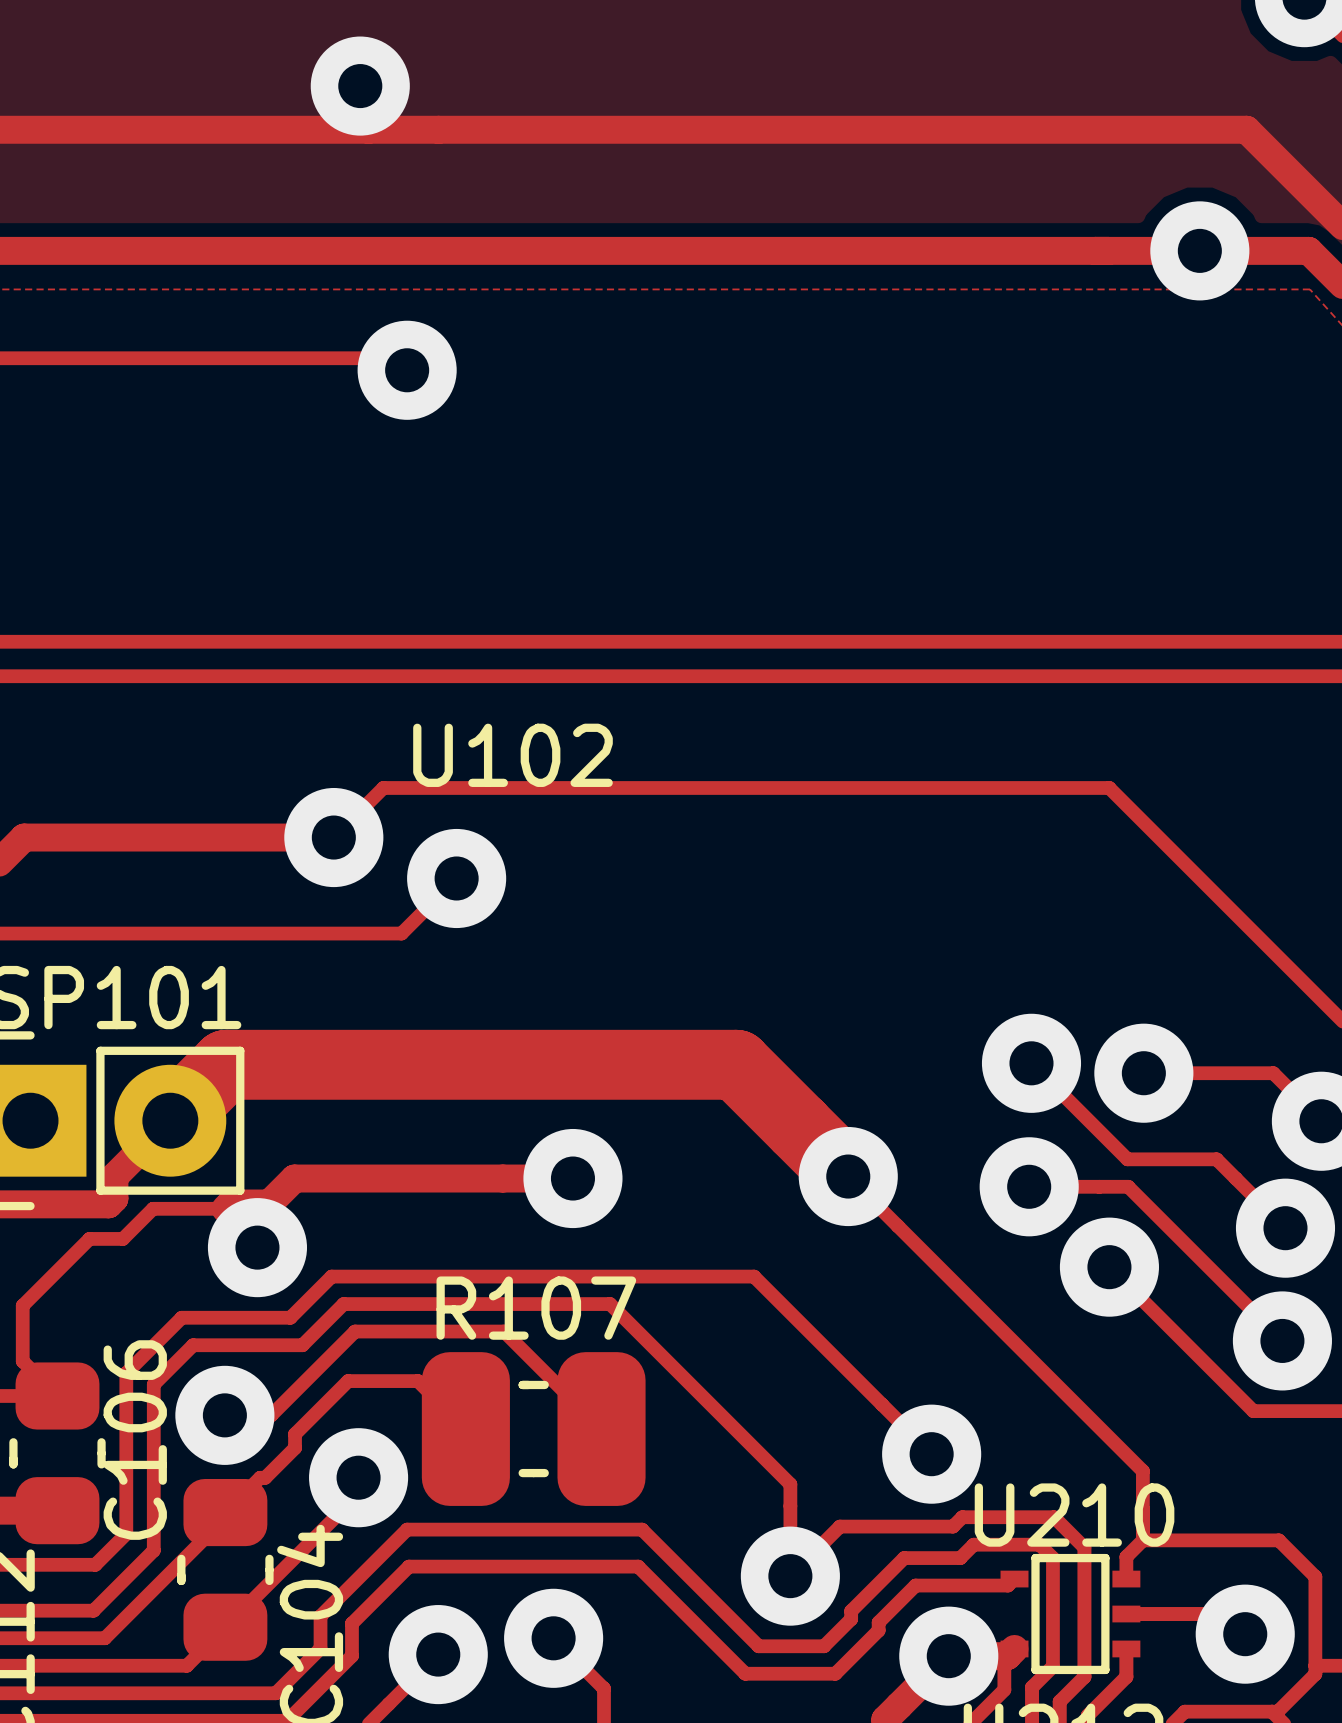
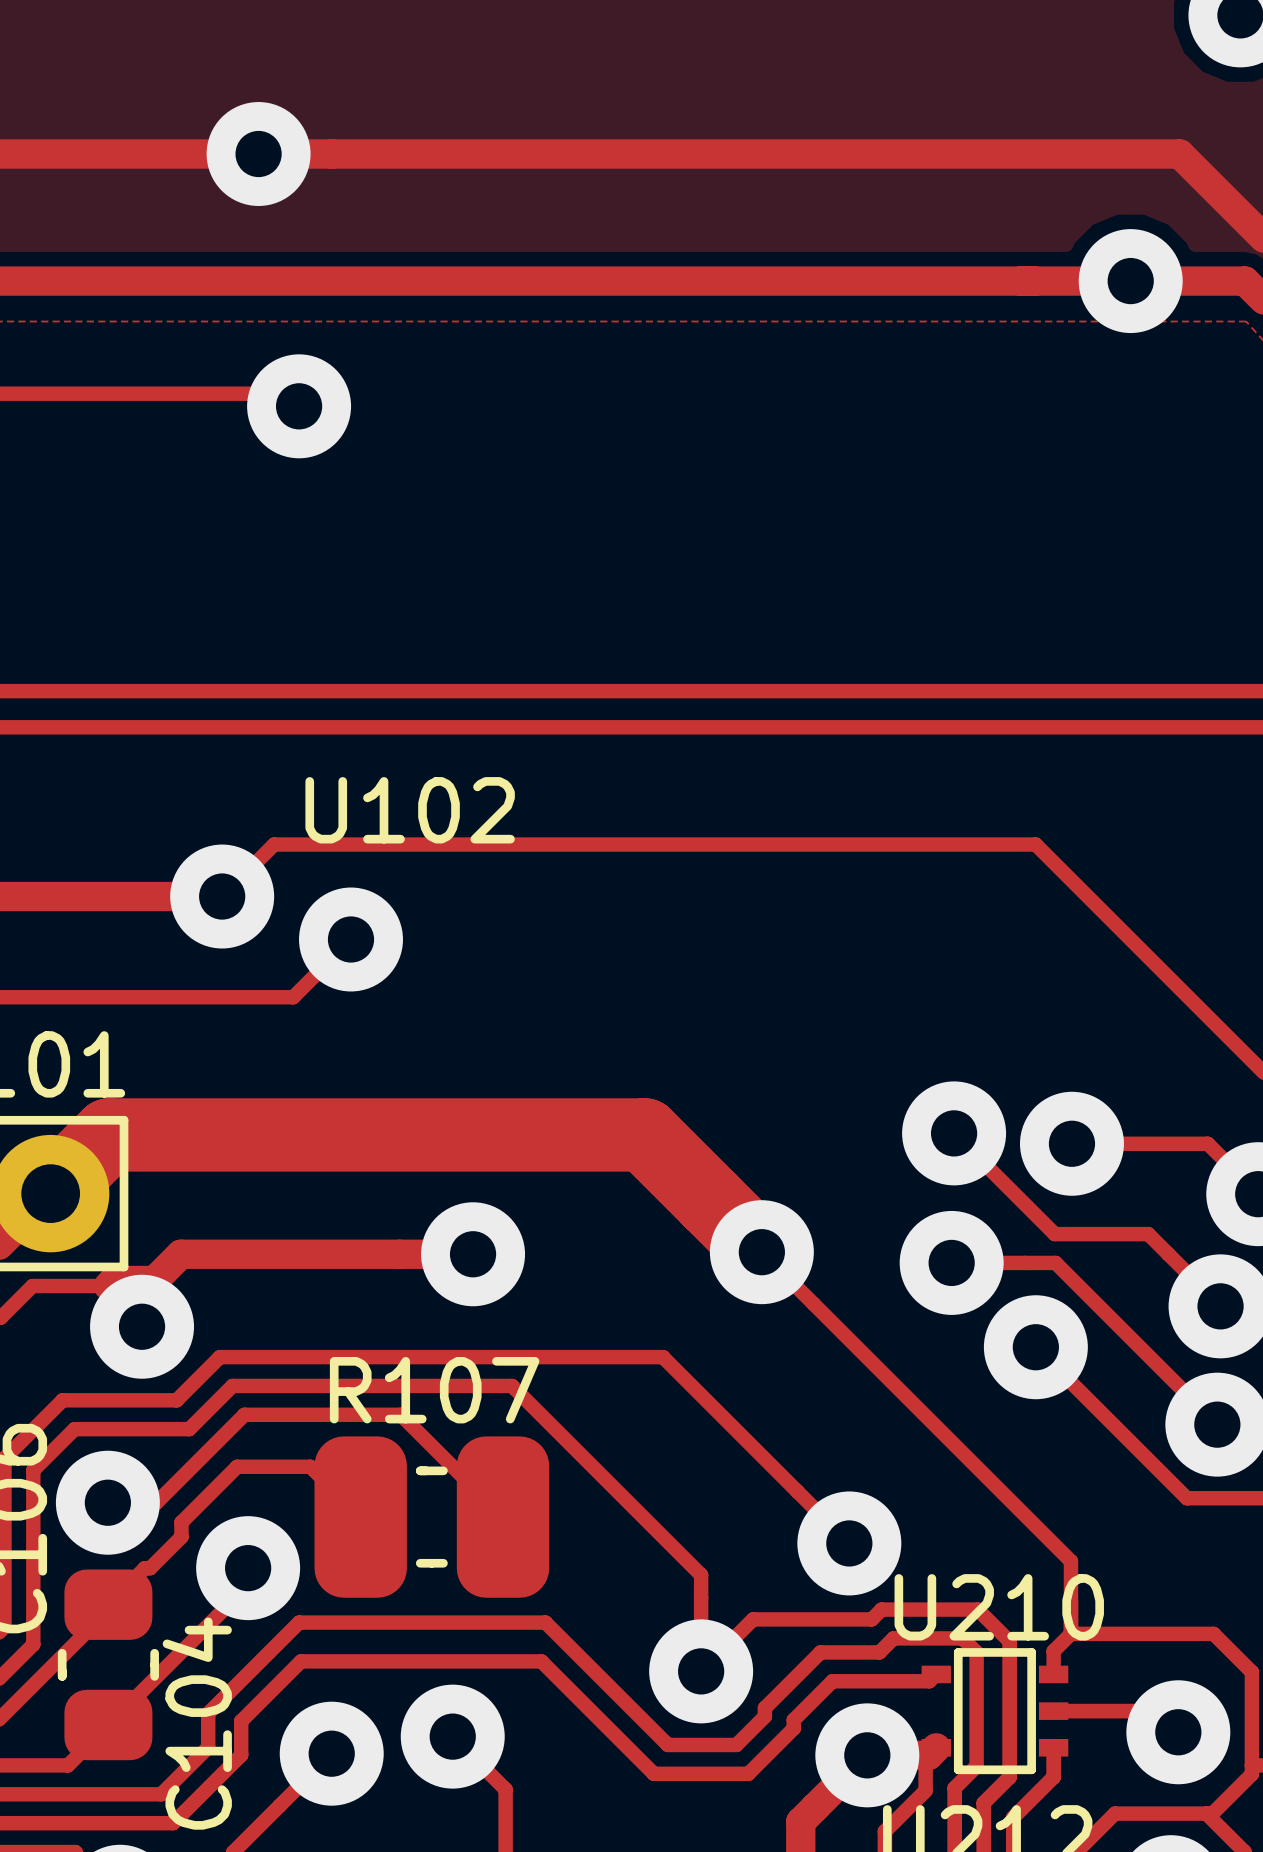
via position: (360, 86) -> (258, 154)

